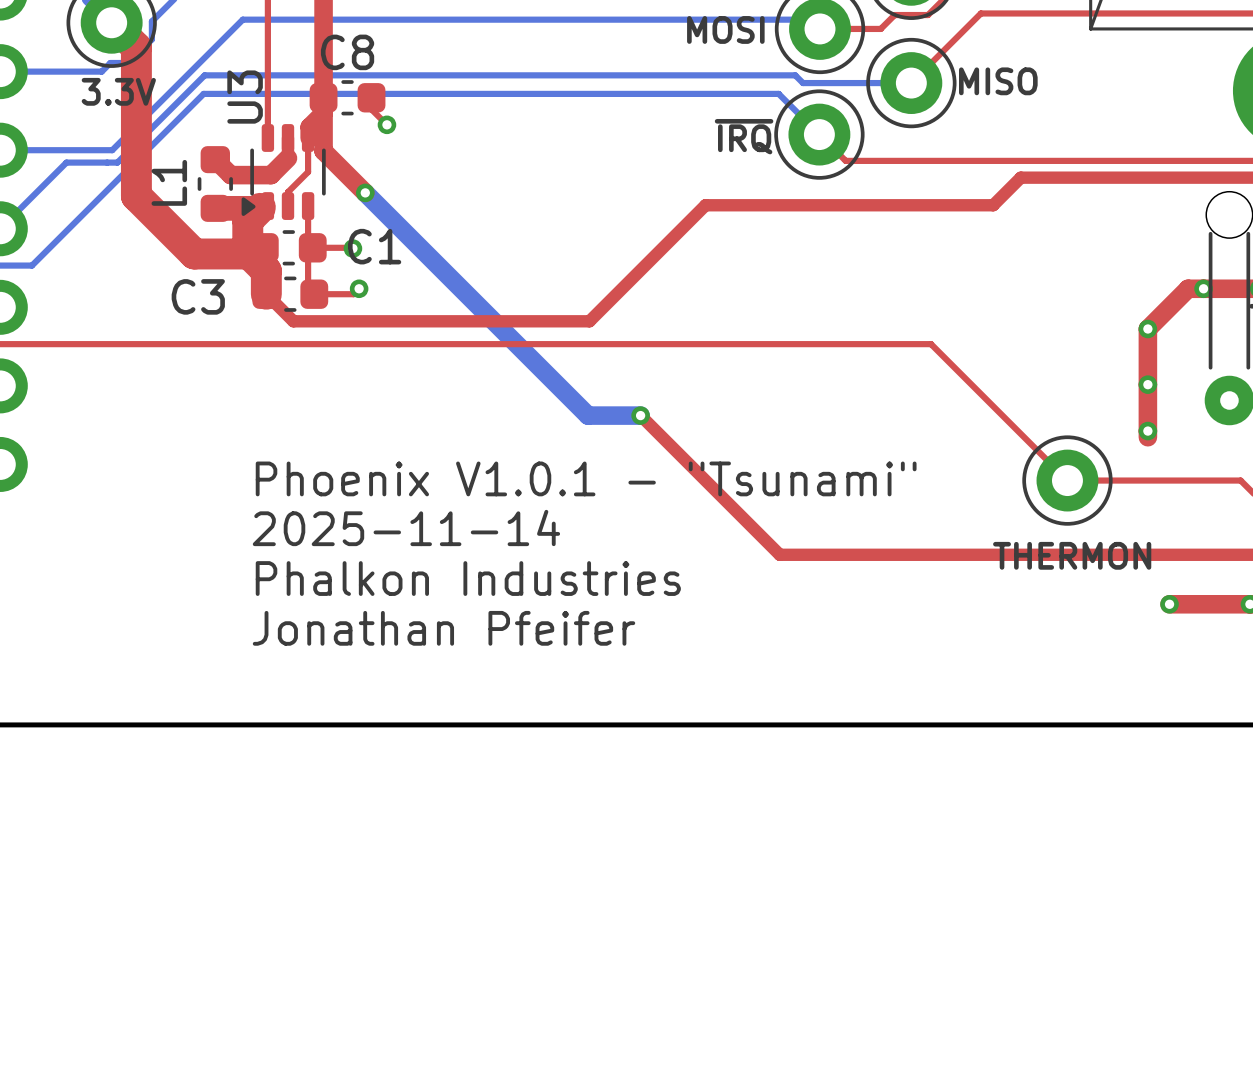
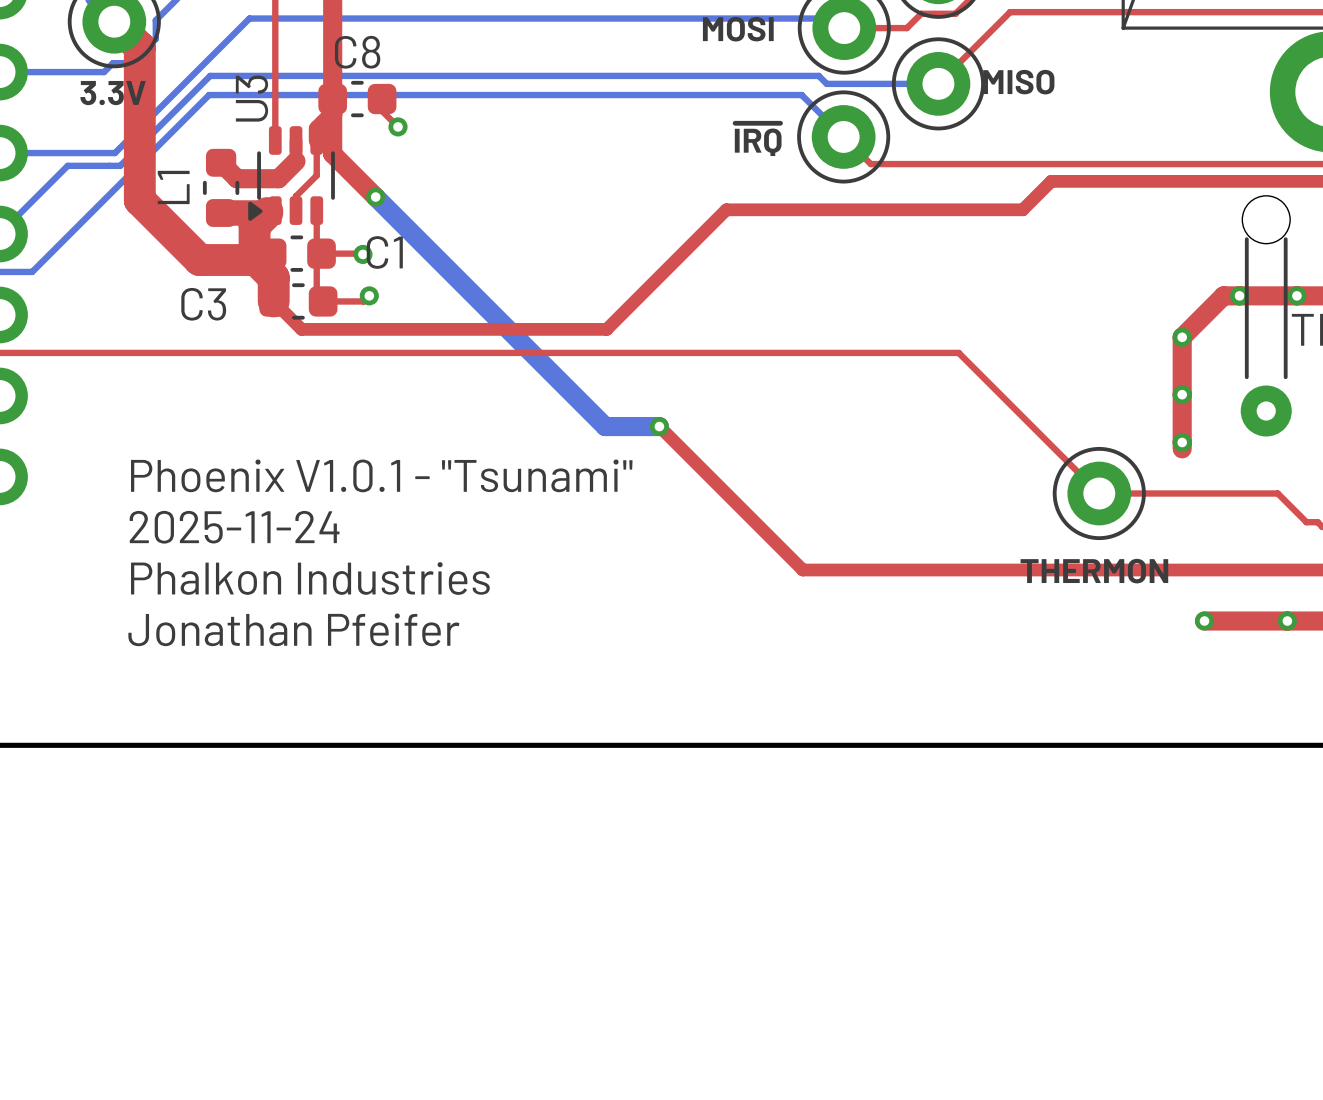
text position: Phoenix V1.0.1 - "Tsunami" (586, 478) -> Phoenix V1.0.1 - "Tsunami" (381, 475)
text: 2025-11-14 (406, 527) -> 2025-11-24 (234, 527)
text position: Phalkon Industries (468, 578) -> Phalkon Industries (310, 578)
text position: Jonathan Pfeifer (444, 628) -> Jonathan Pfeifer (293, 629)

